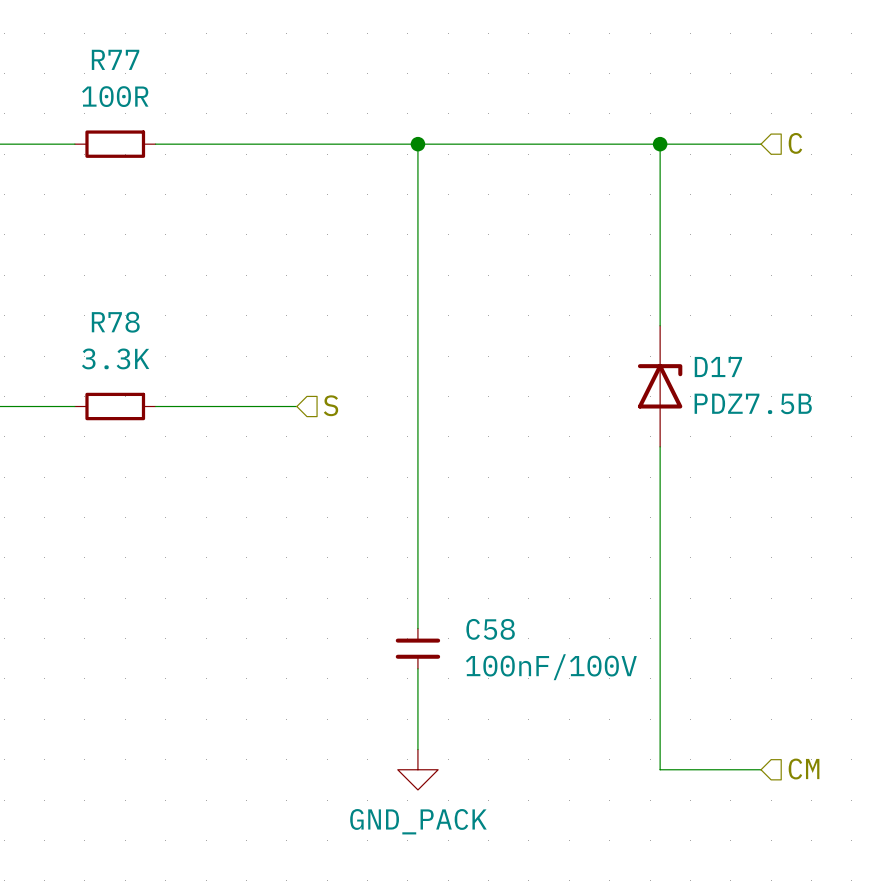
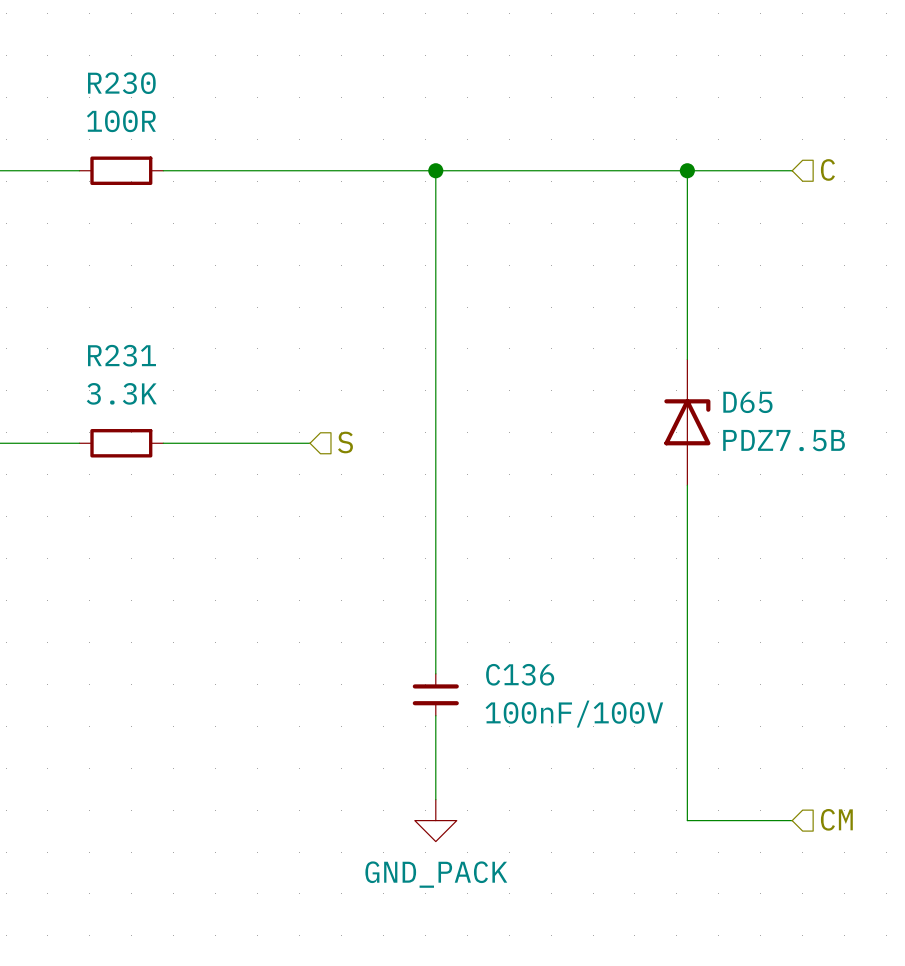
R77 name: R77 (115, 59) -> R230 (121, 83)
R78 name: R78 (115, 322) -> R231 (121, 355)
D17 name: D17 (718, 367) -> D65 (747, 402)
C58 name: C58 (490, 629) -> C136 (520, 674)

